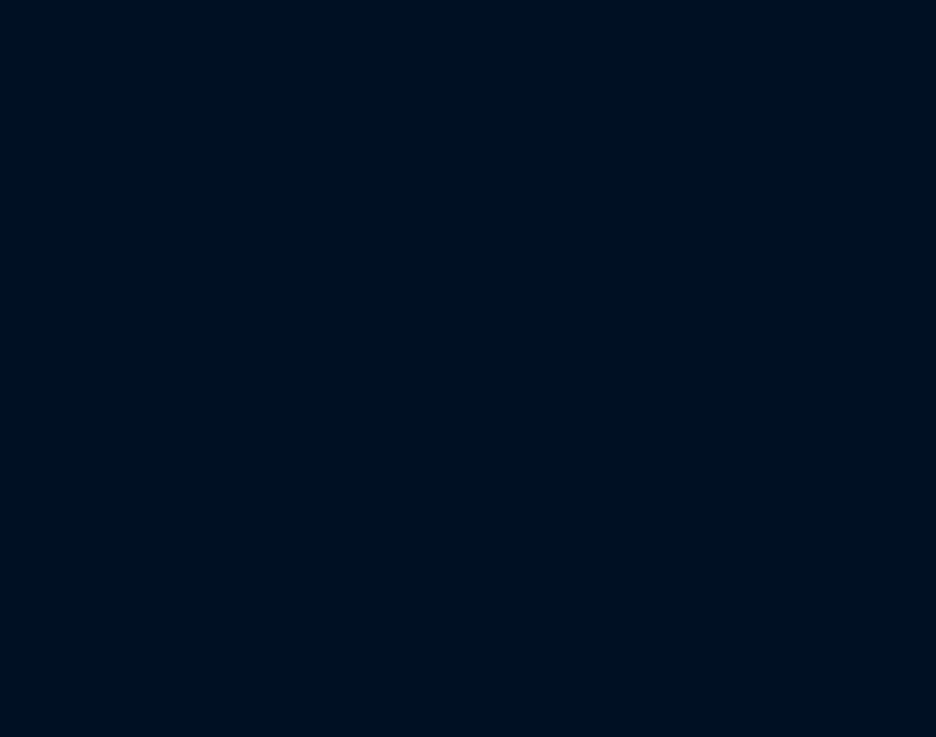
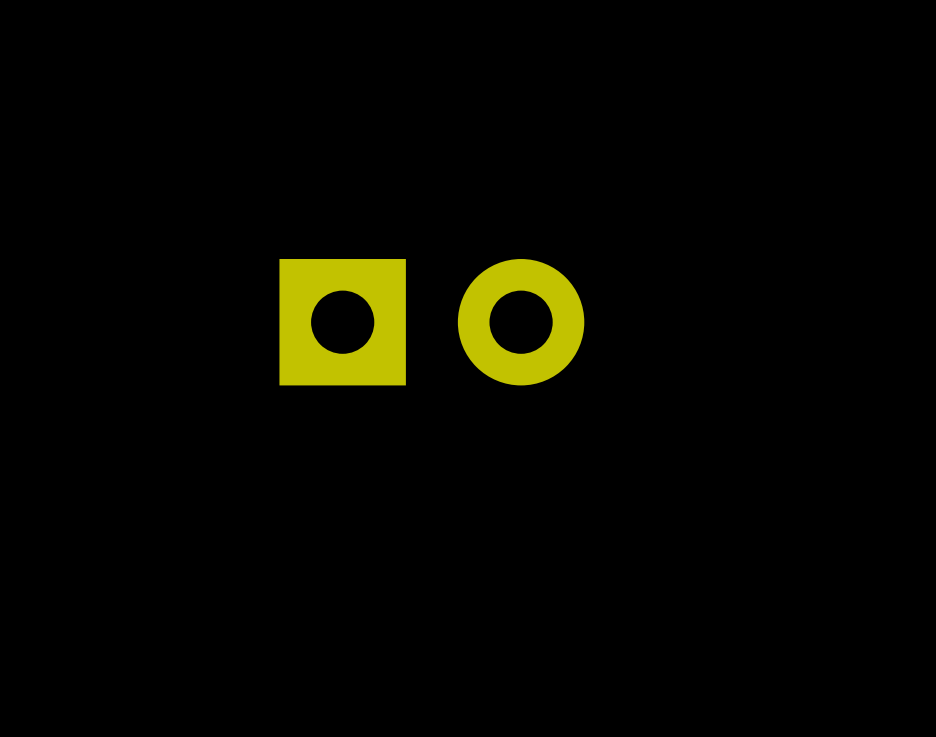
part: none -> (431, 322)

